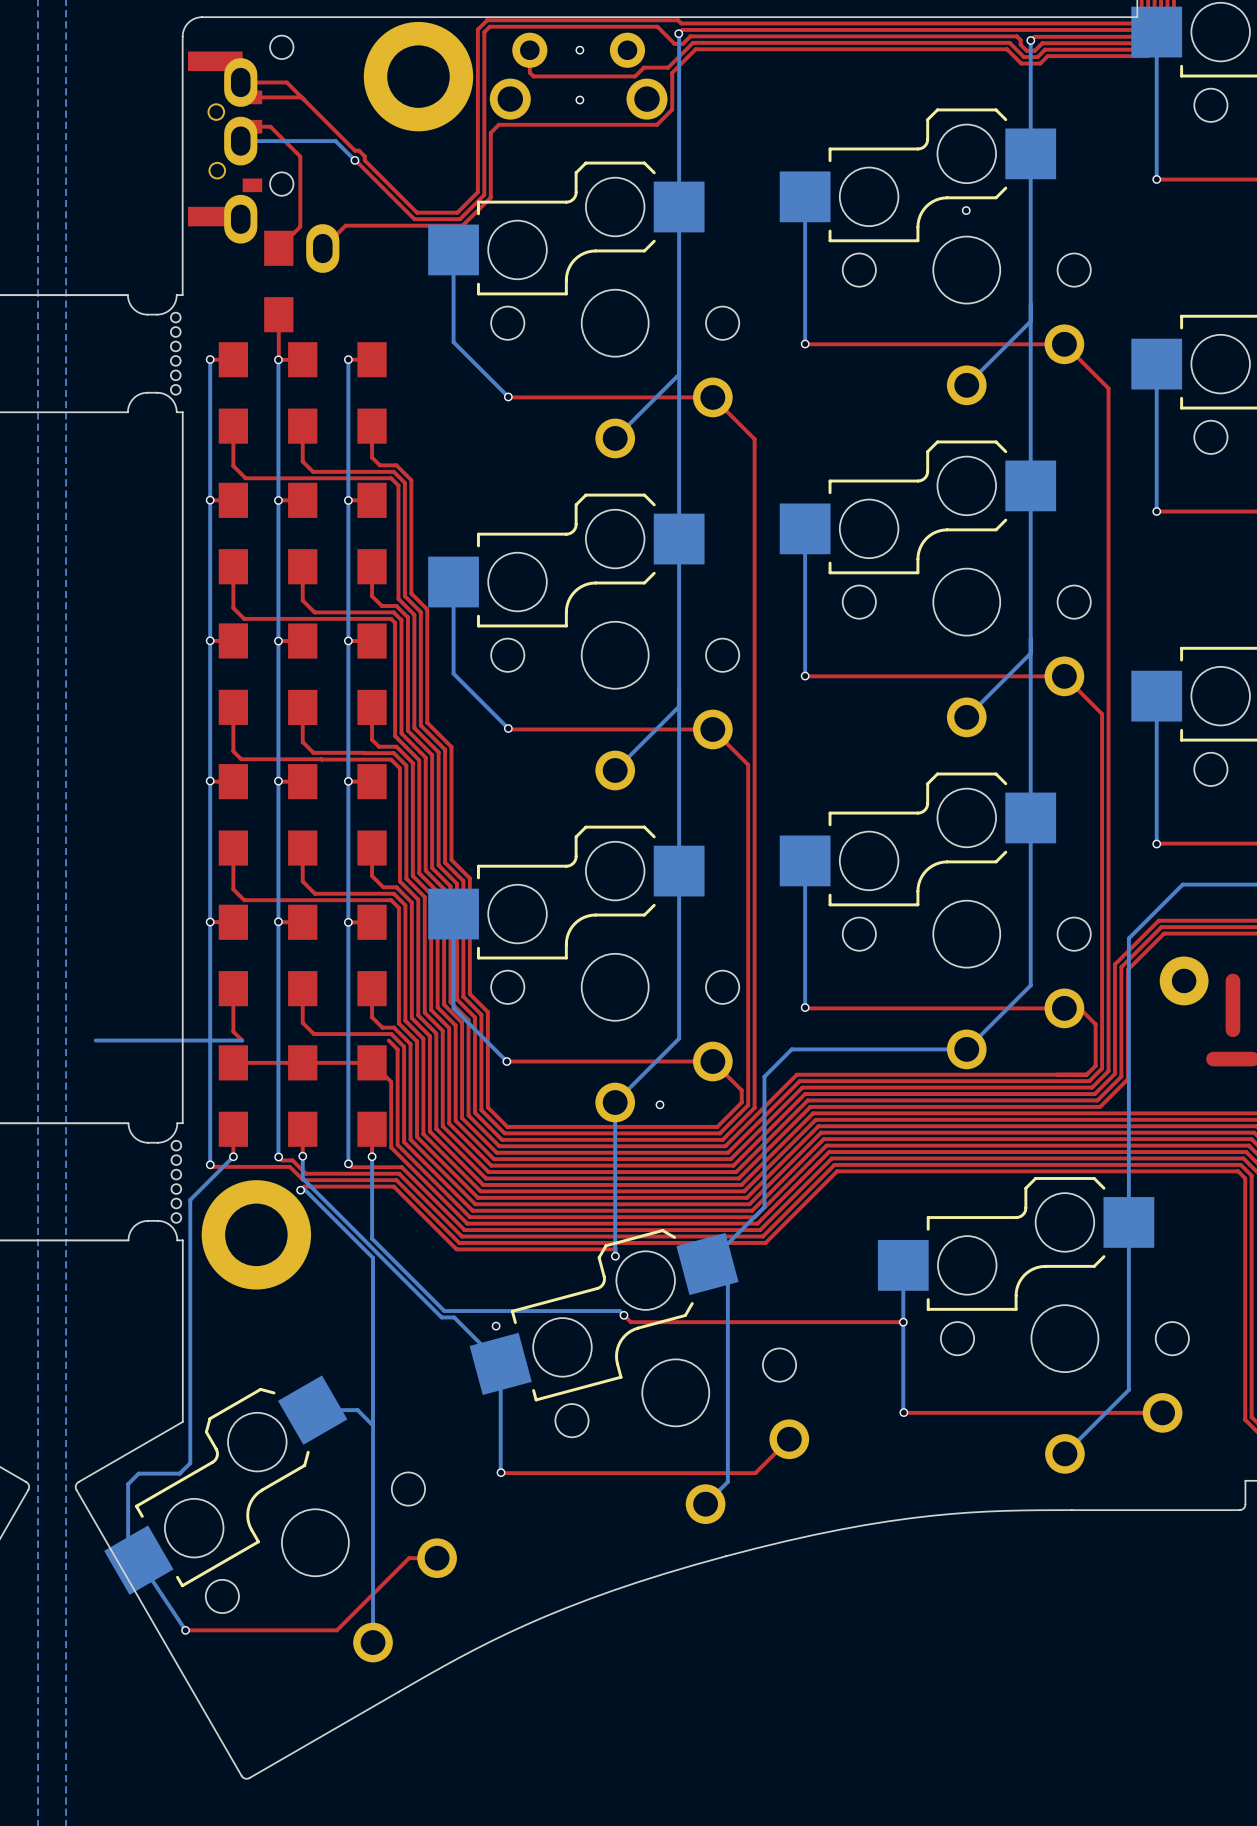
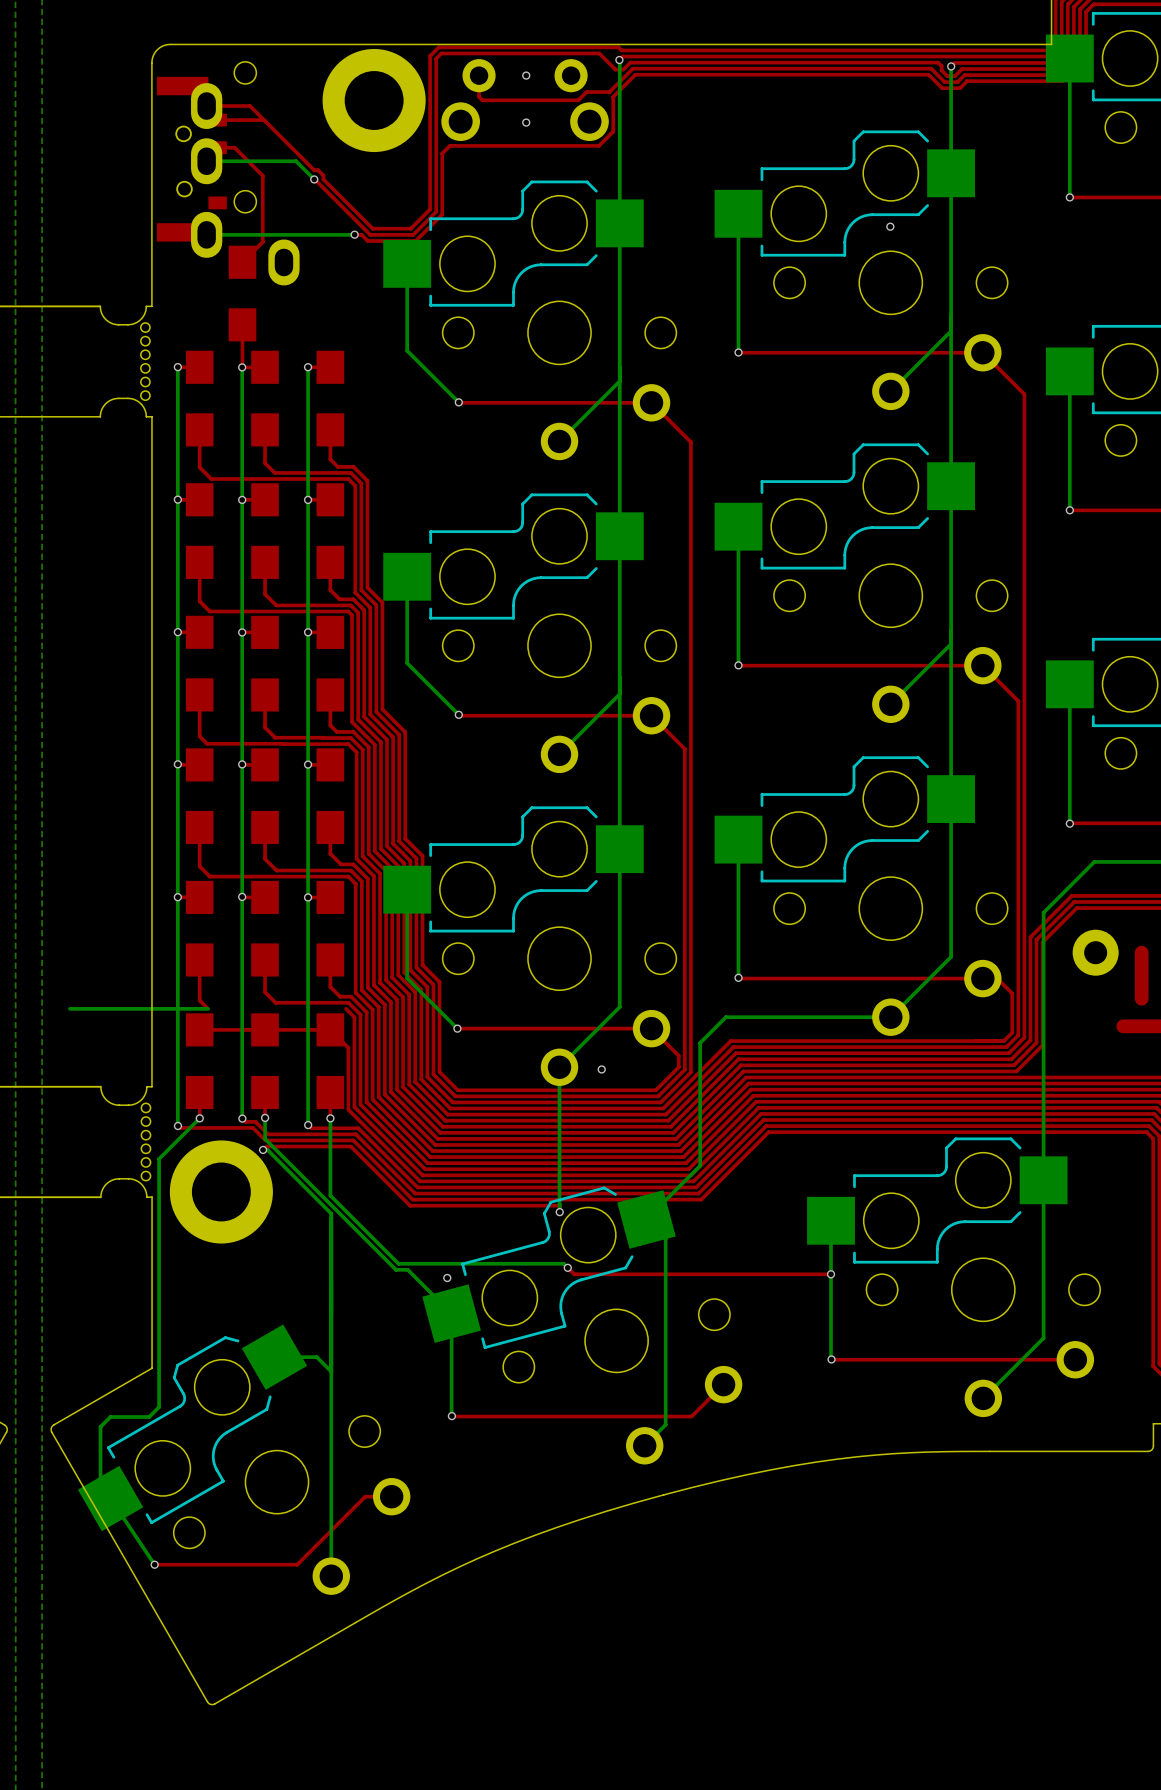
bottom track: none -> (354, 234) (206, 234)
via: none -> (354, 234)
top track: (411, 225) (345, 225) (322, 248) -> (367, 240) (361, 234) (354, 234)

